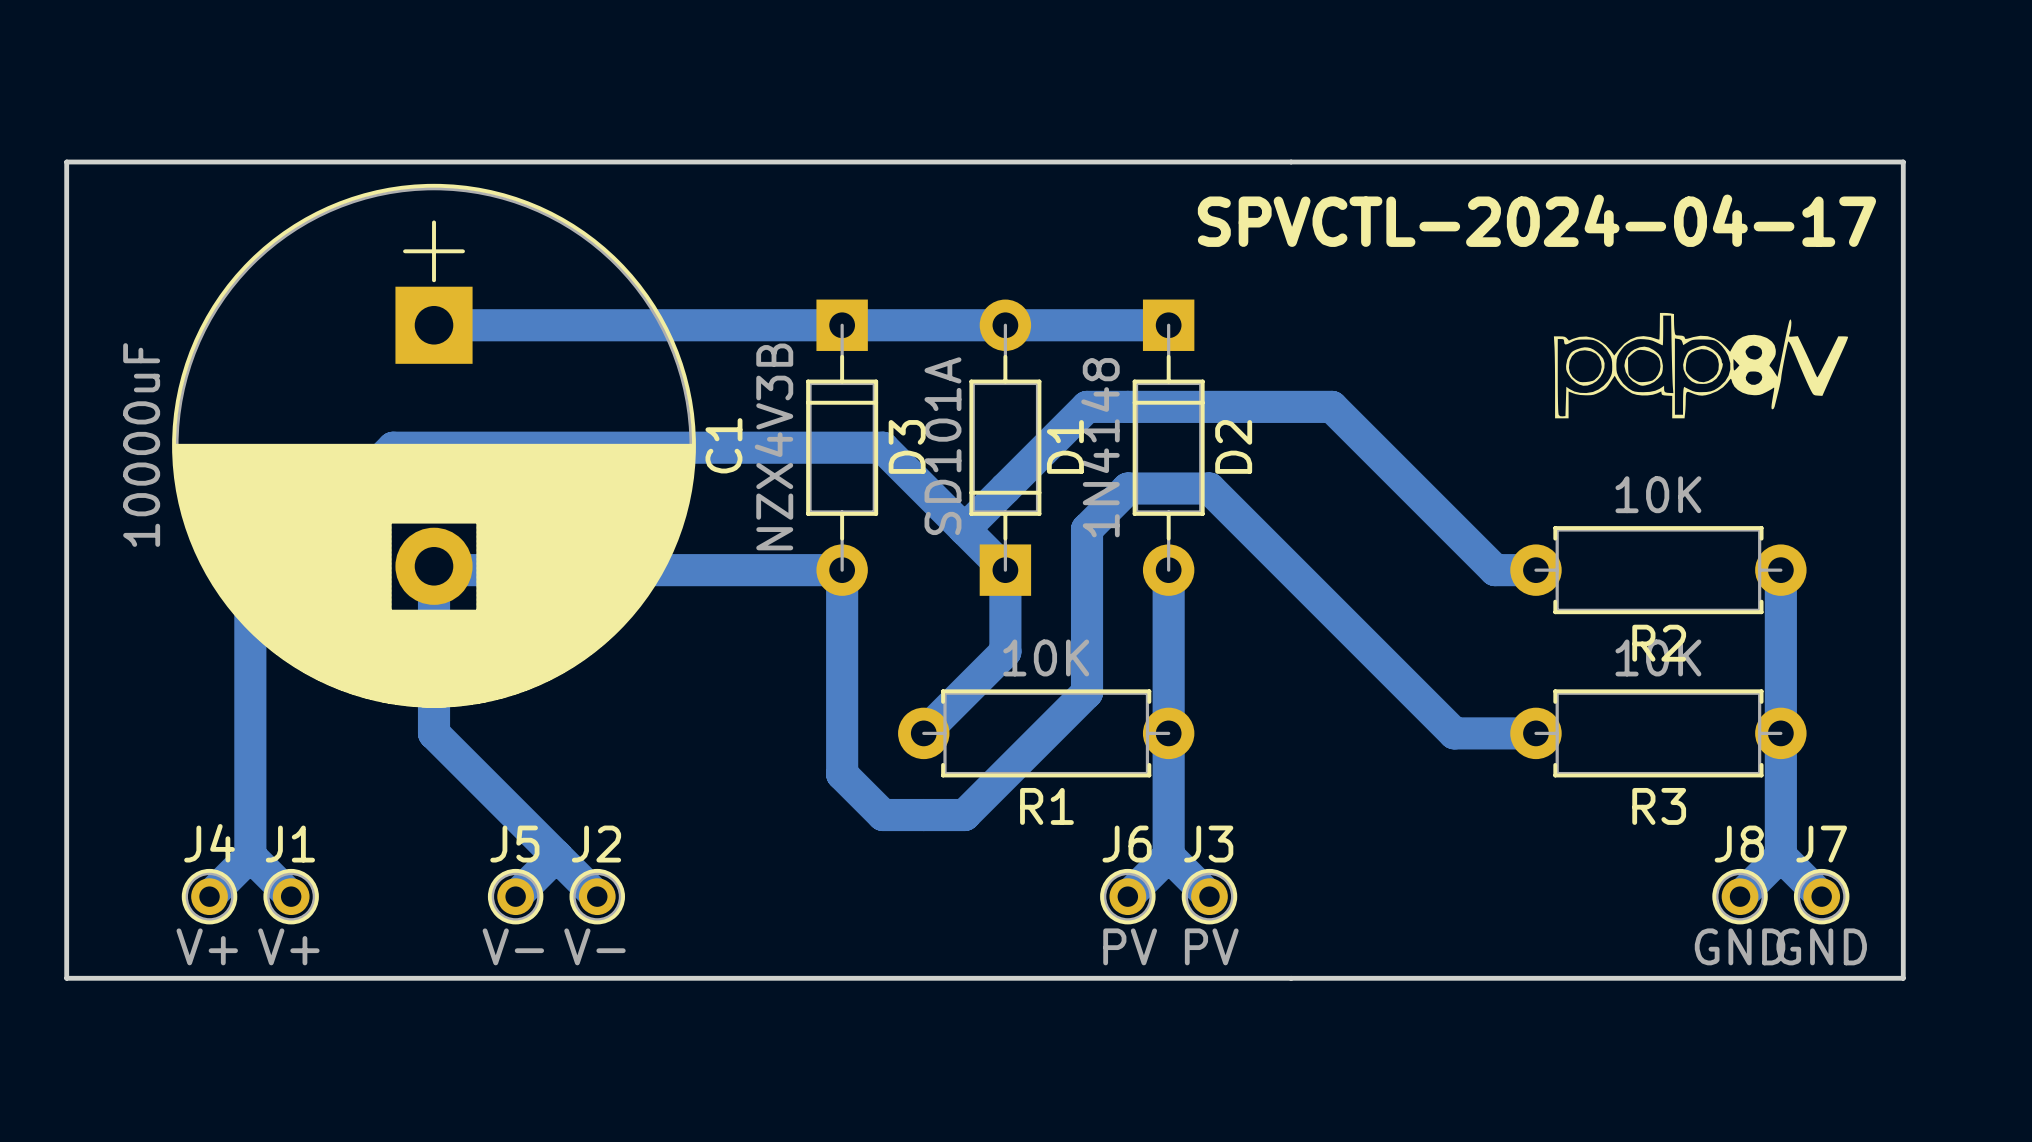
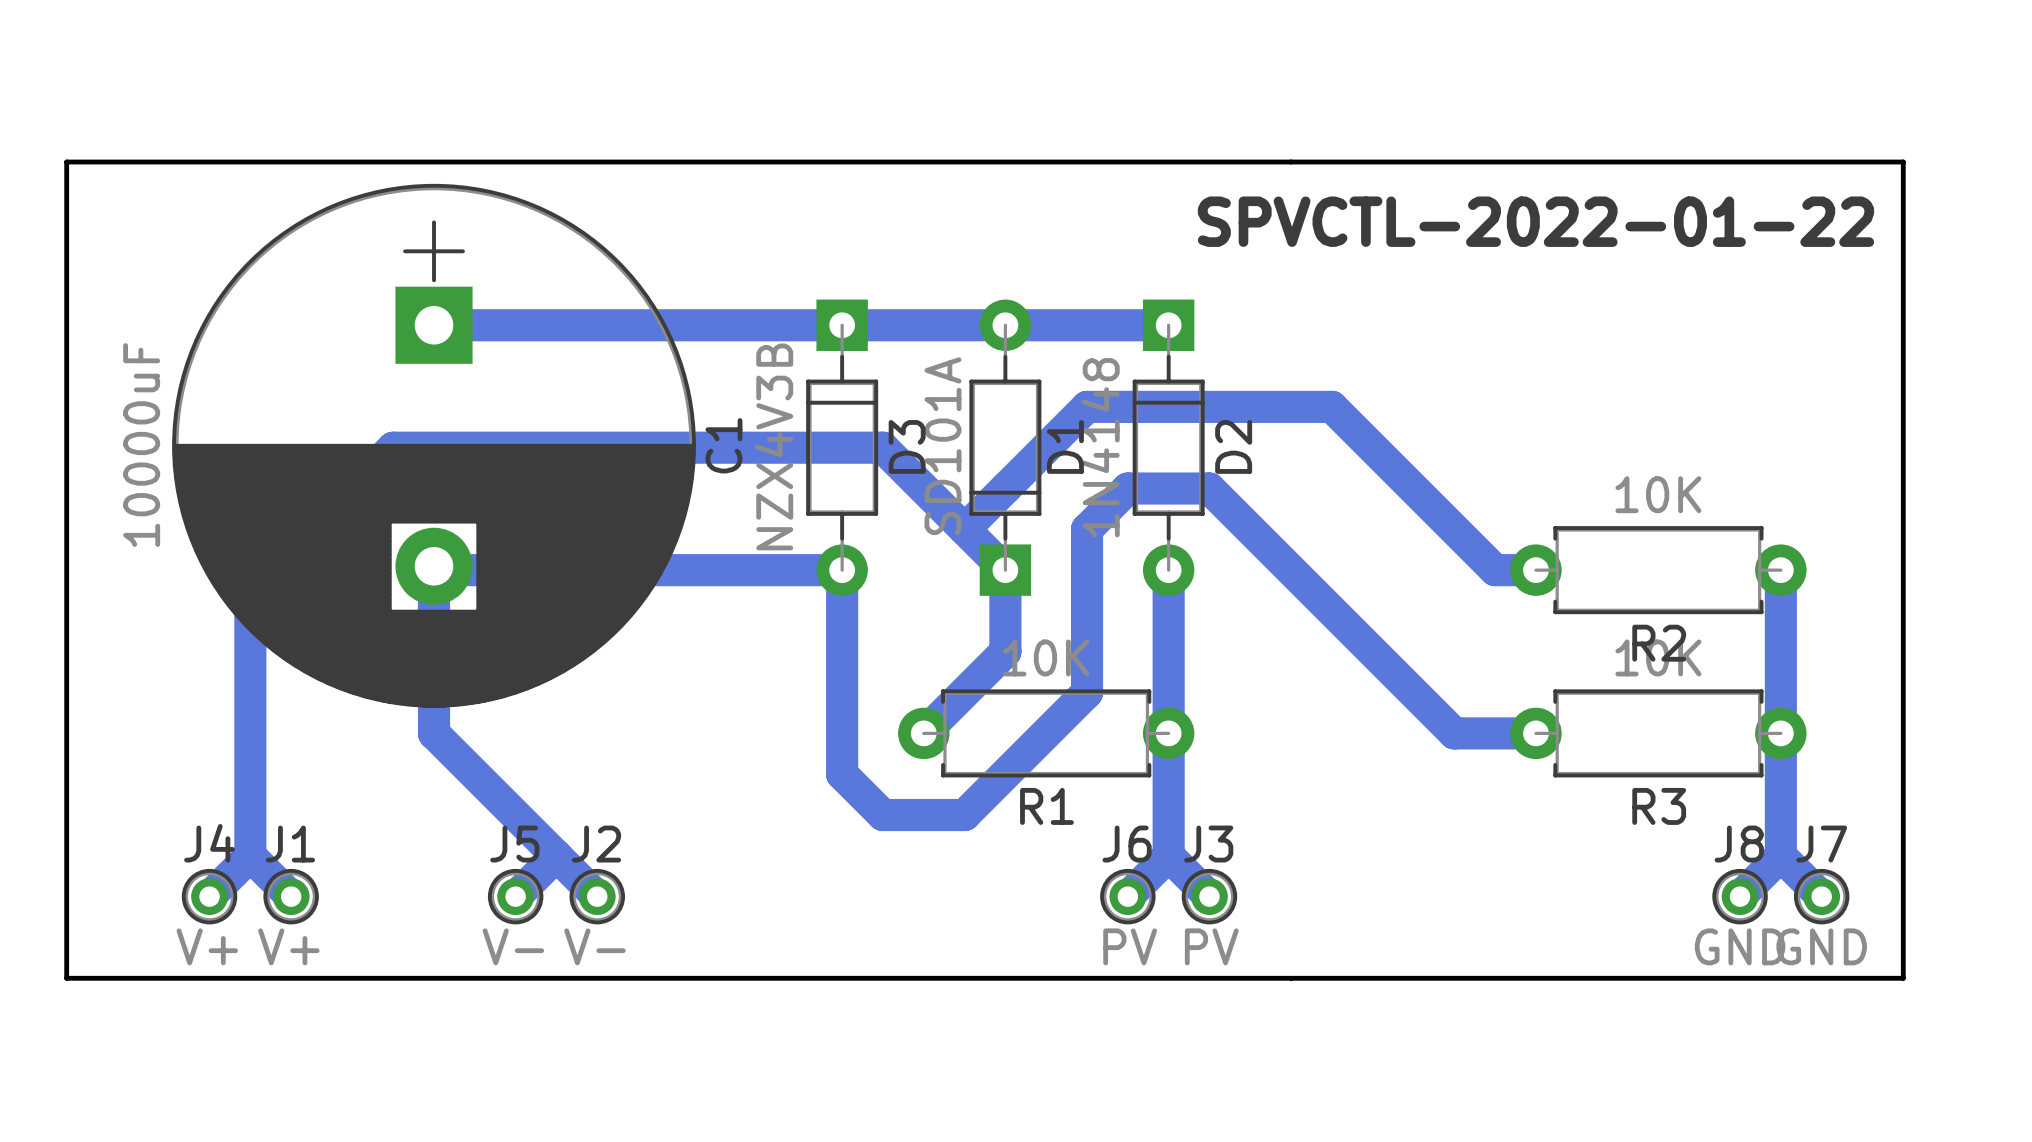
text: SPVCTL-2024-04-17 (1536, 220) -> SPVCTL-2022-01-22 (1535, 221)
drawing: [1553, 312, 1849, 419] -> none

